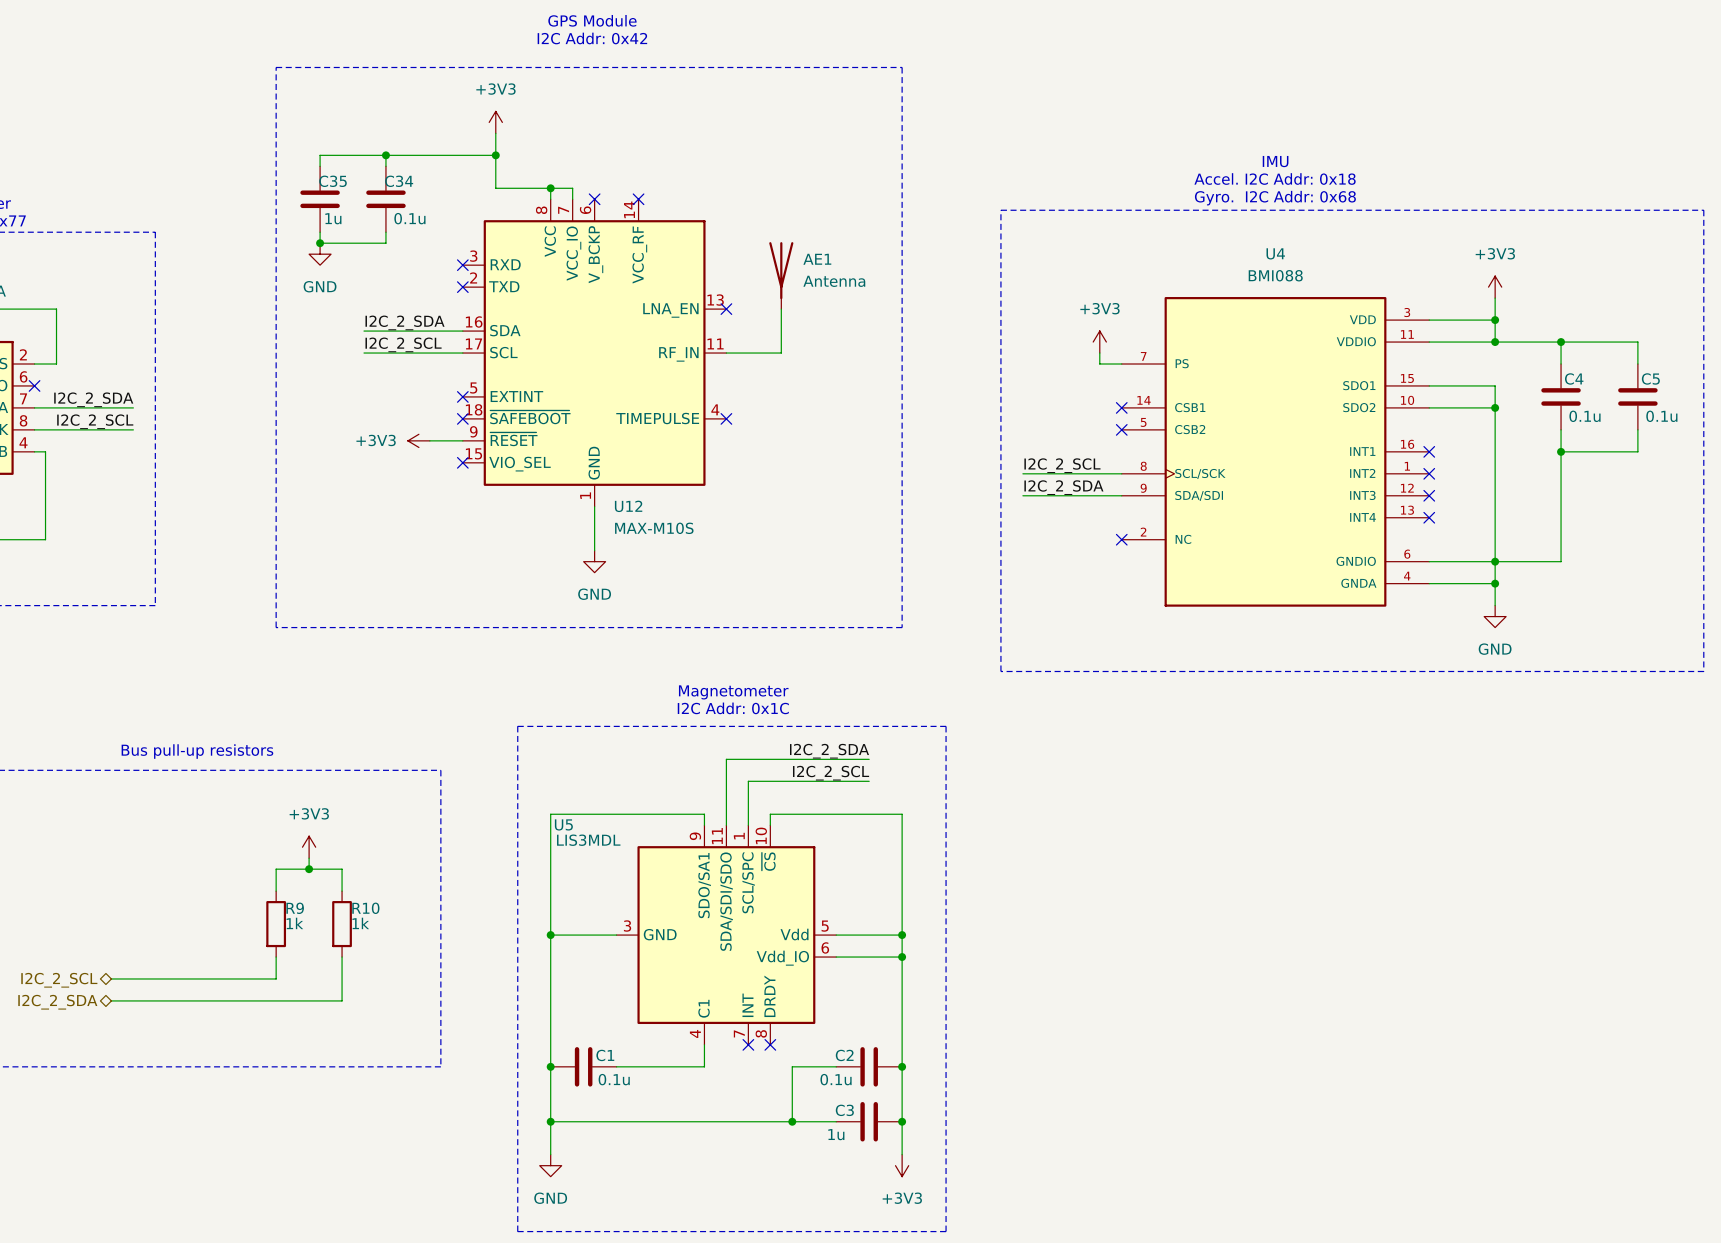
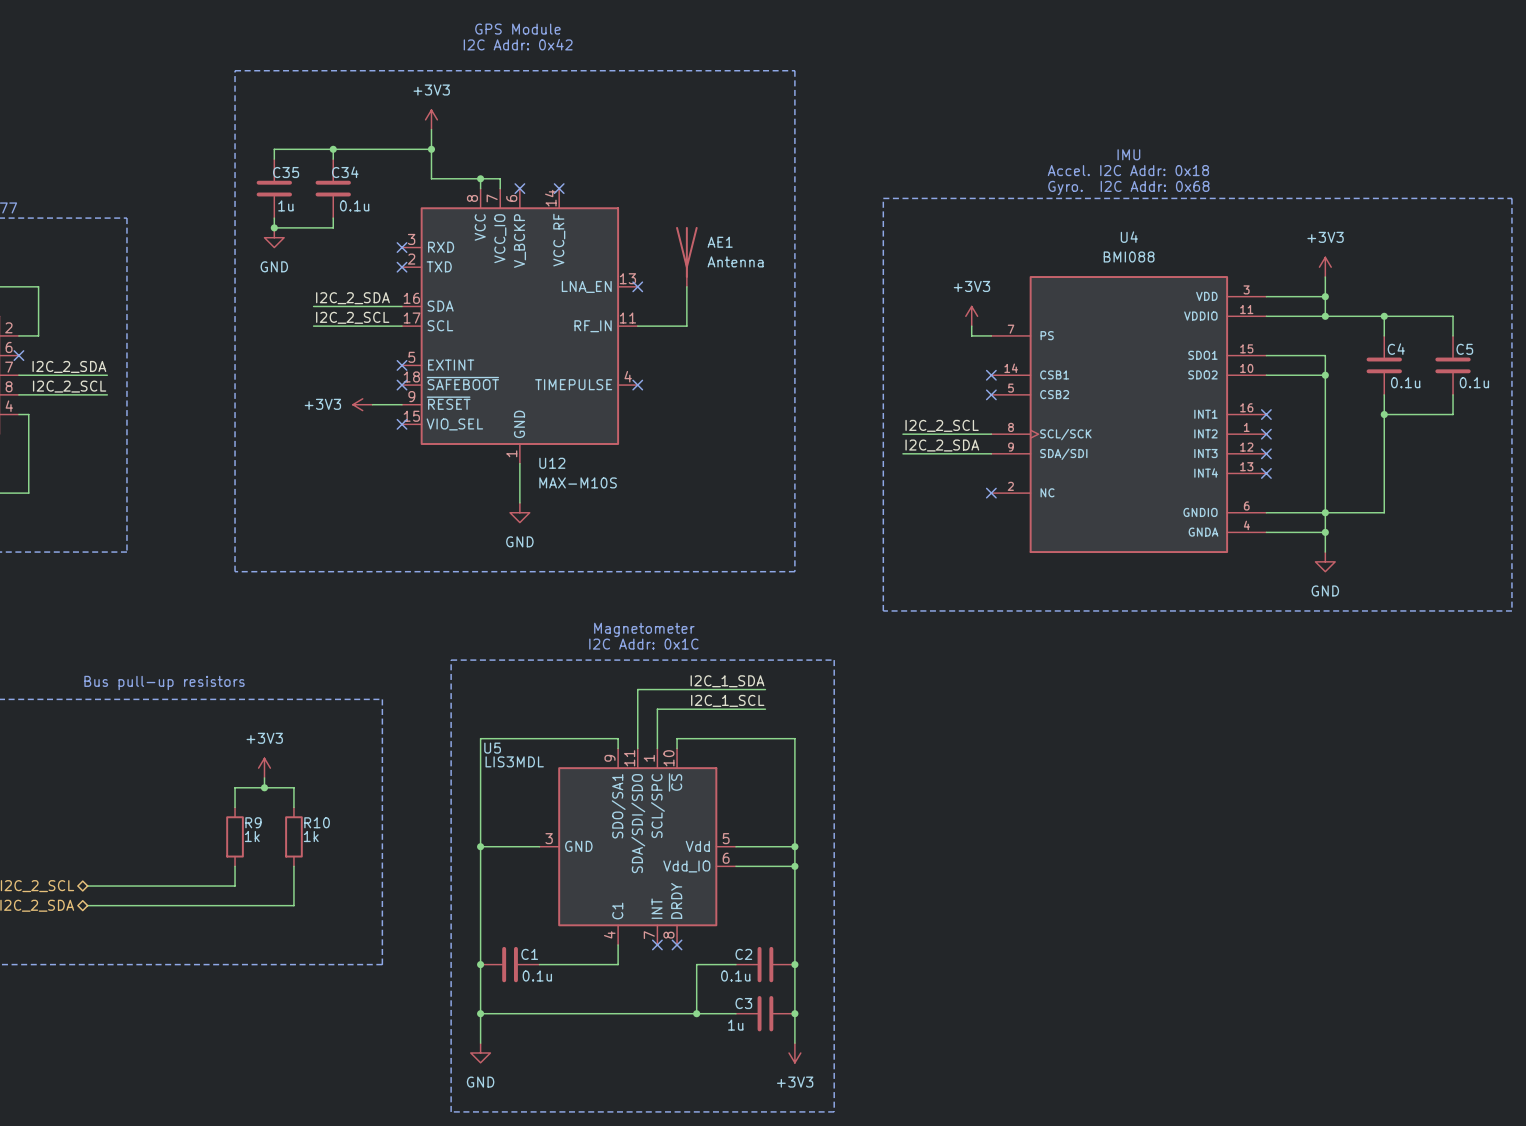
label: I2C_2_SDA (829, 751) -> I2C_1_SDA (727, 681)
label: I2C_2_SCL (831, 773) -> I2C_1_SCL (727, 700)

